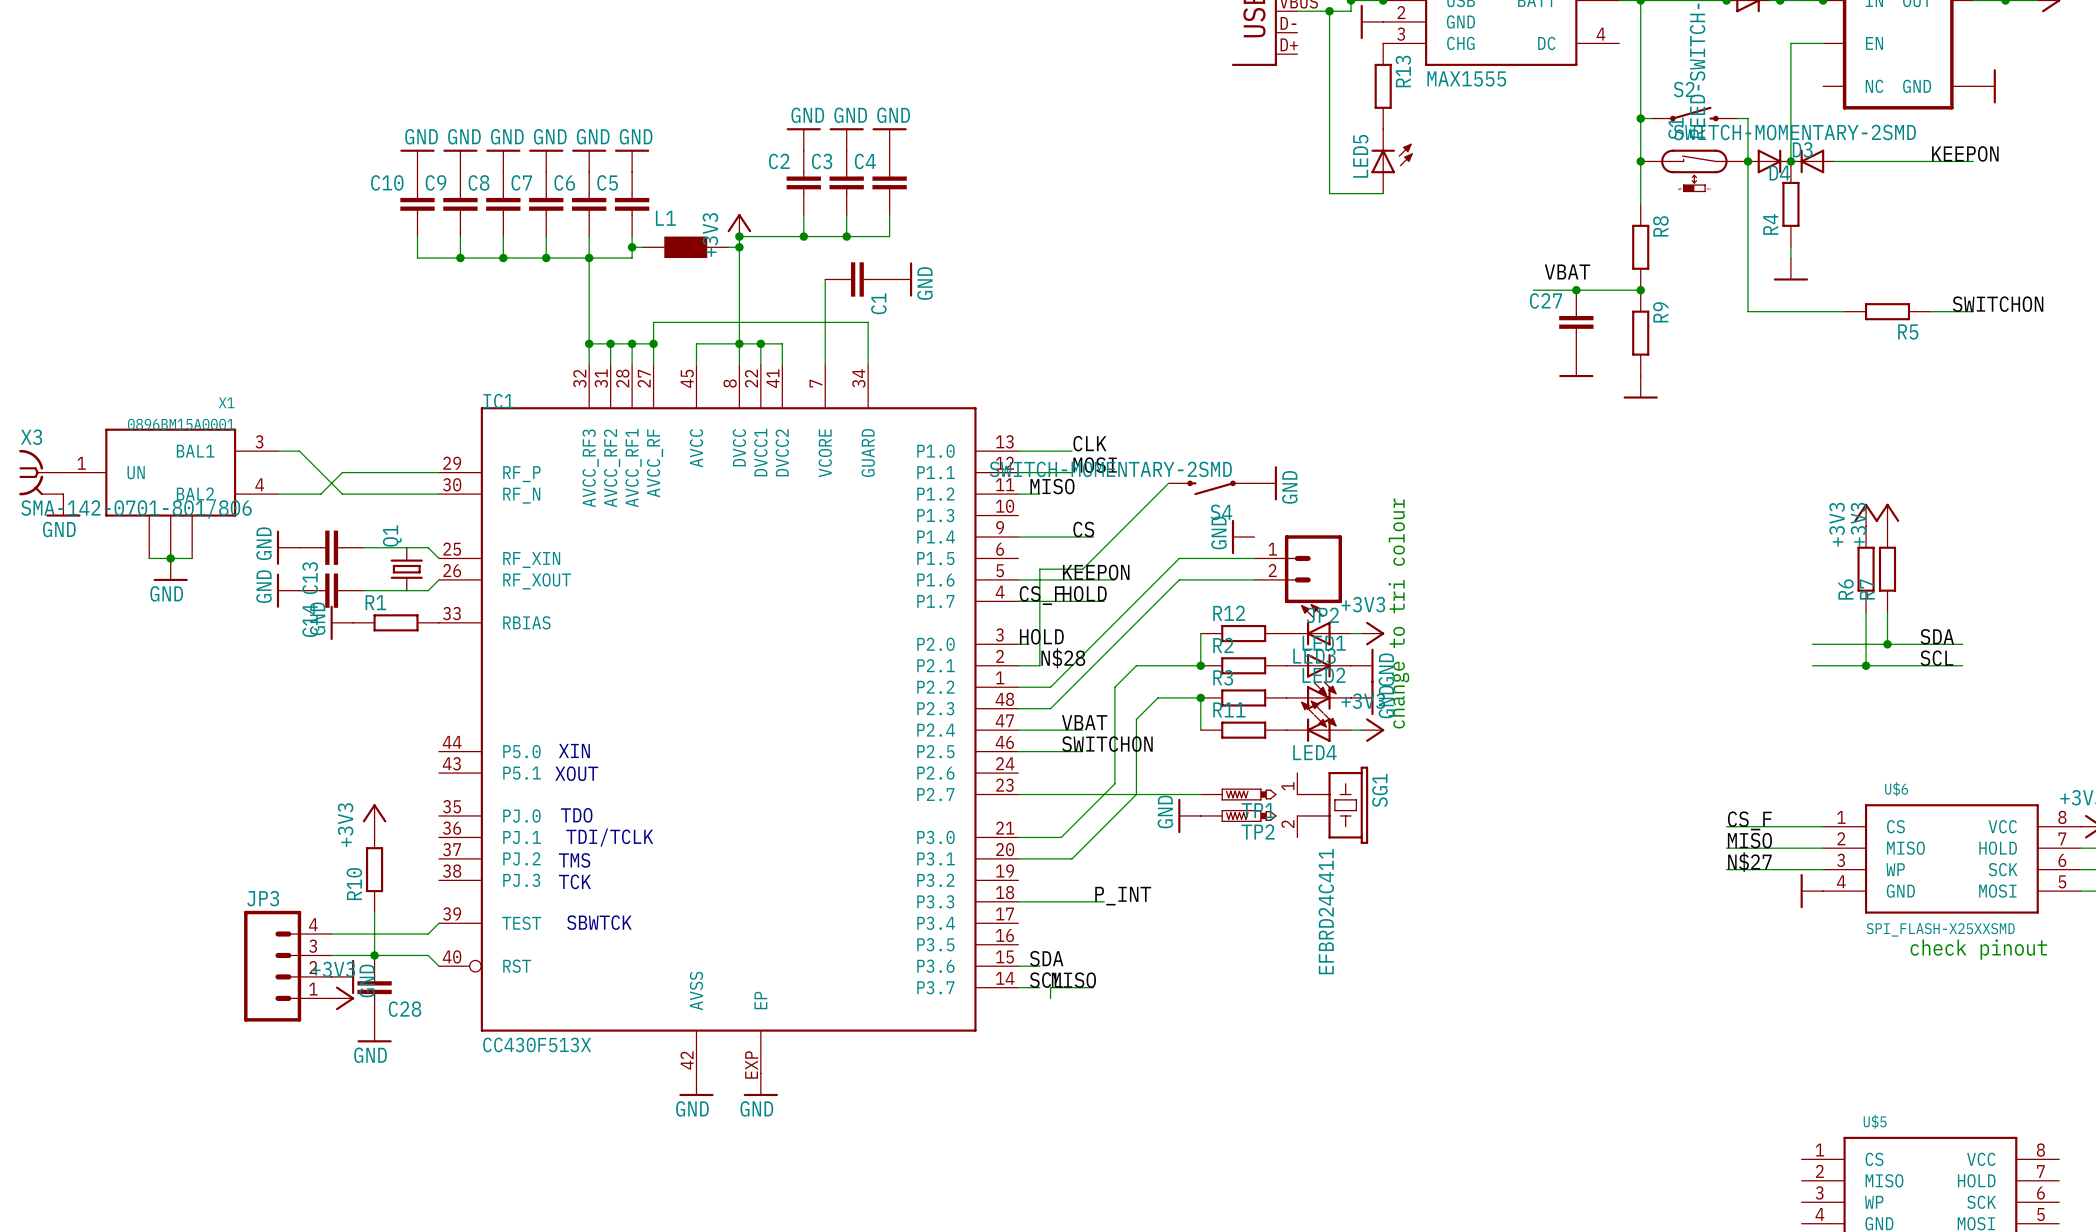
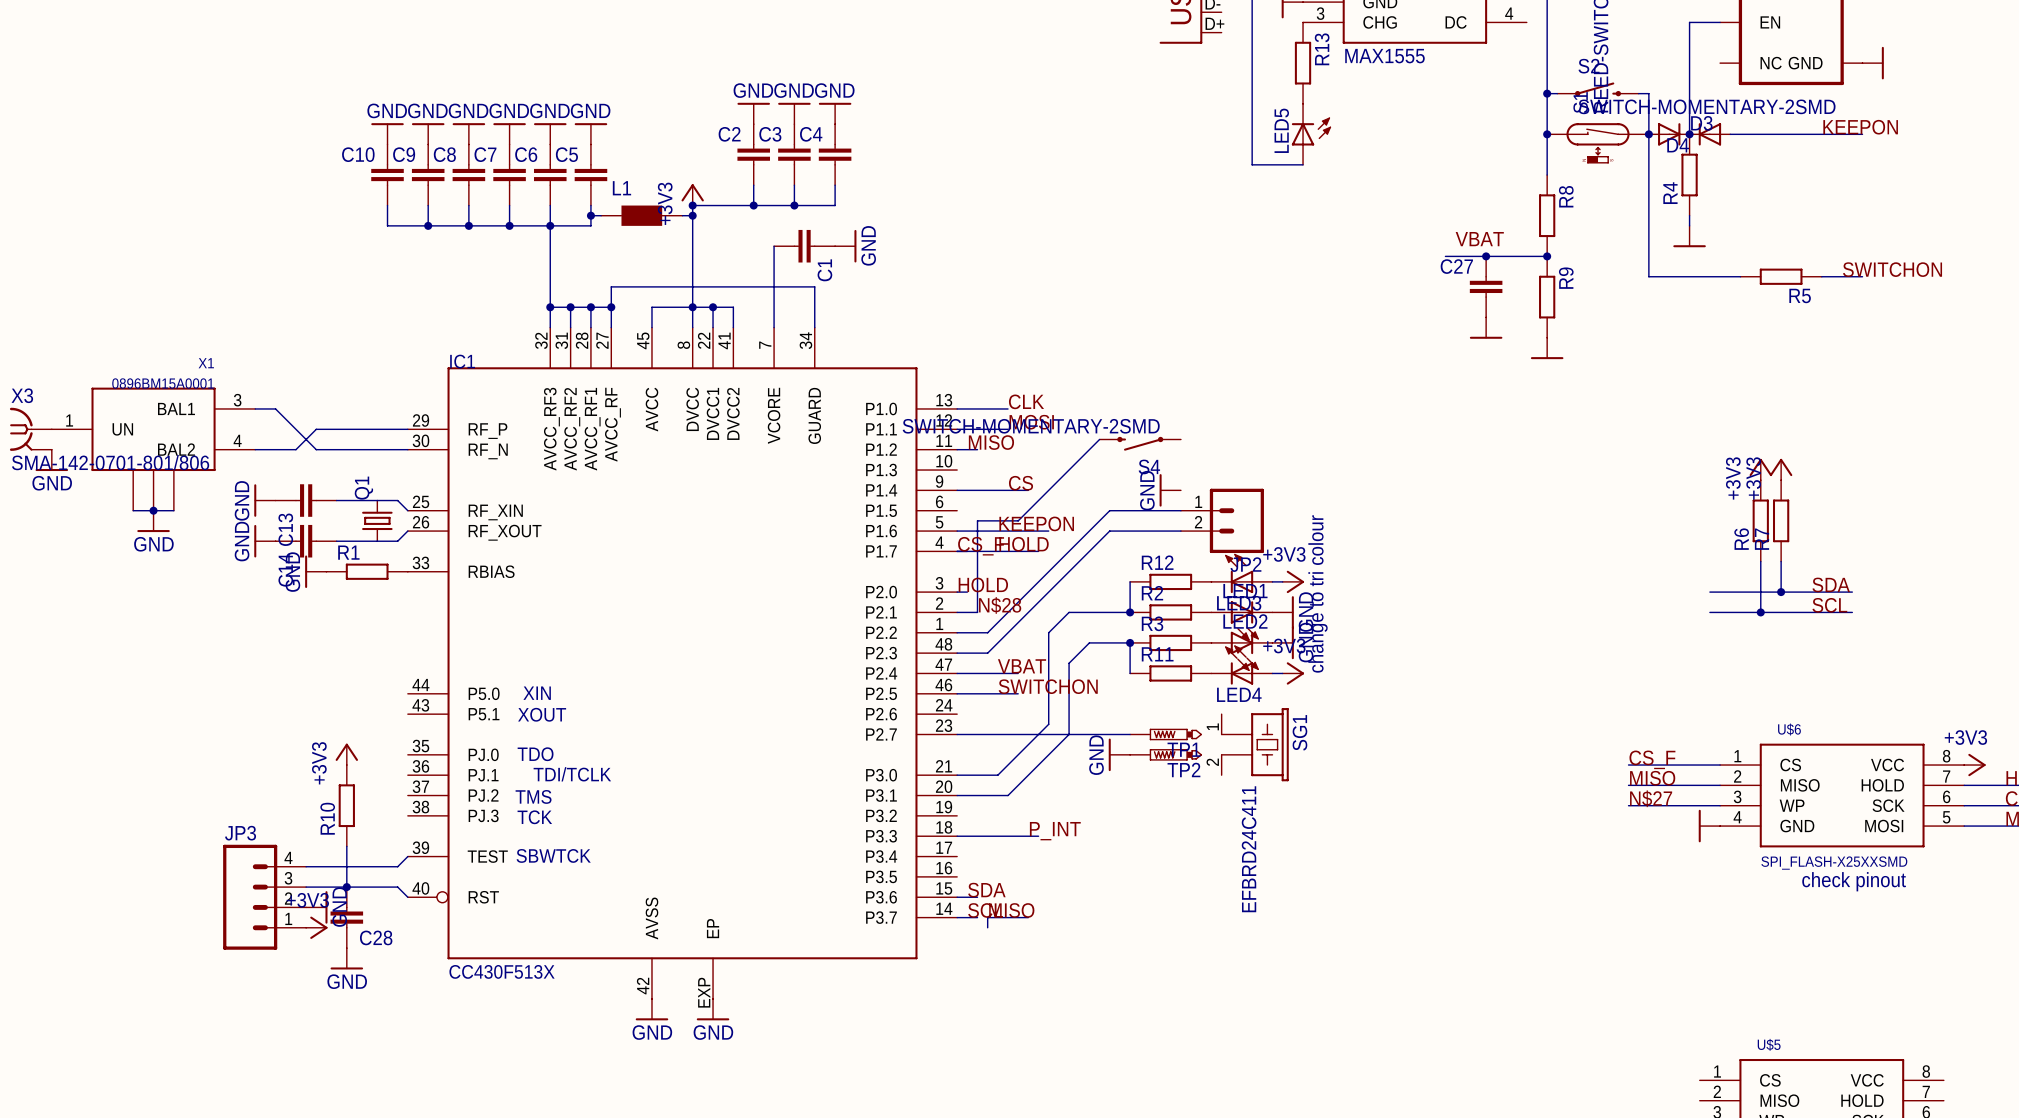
power symbol: GND (1265, 483) -> none

